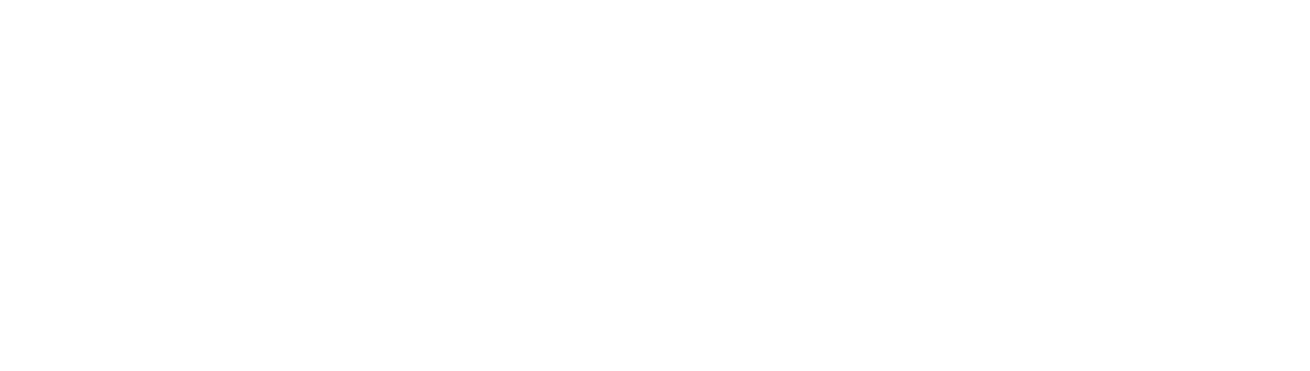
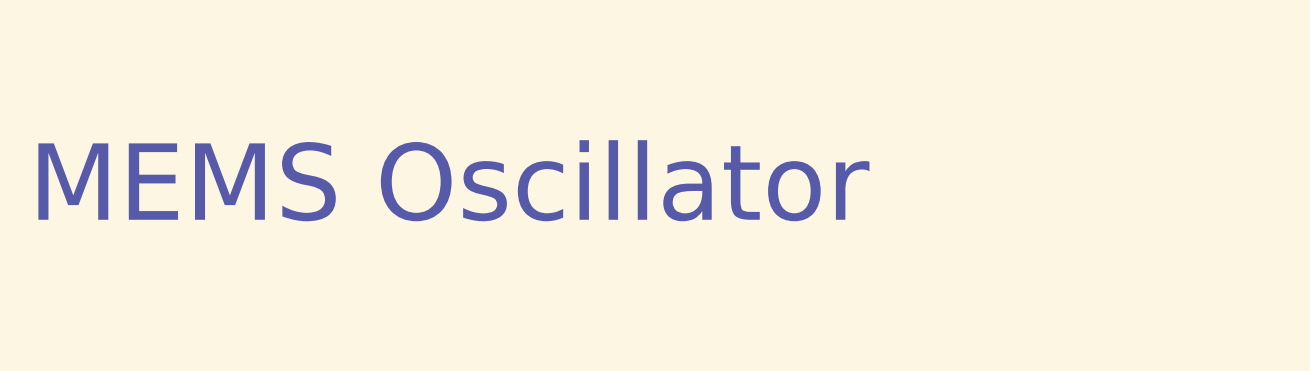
text: none -> MEMS Oscillator (453, 180)

